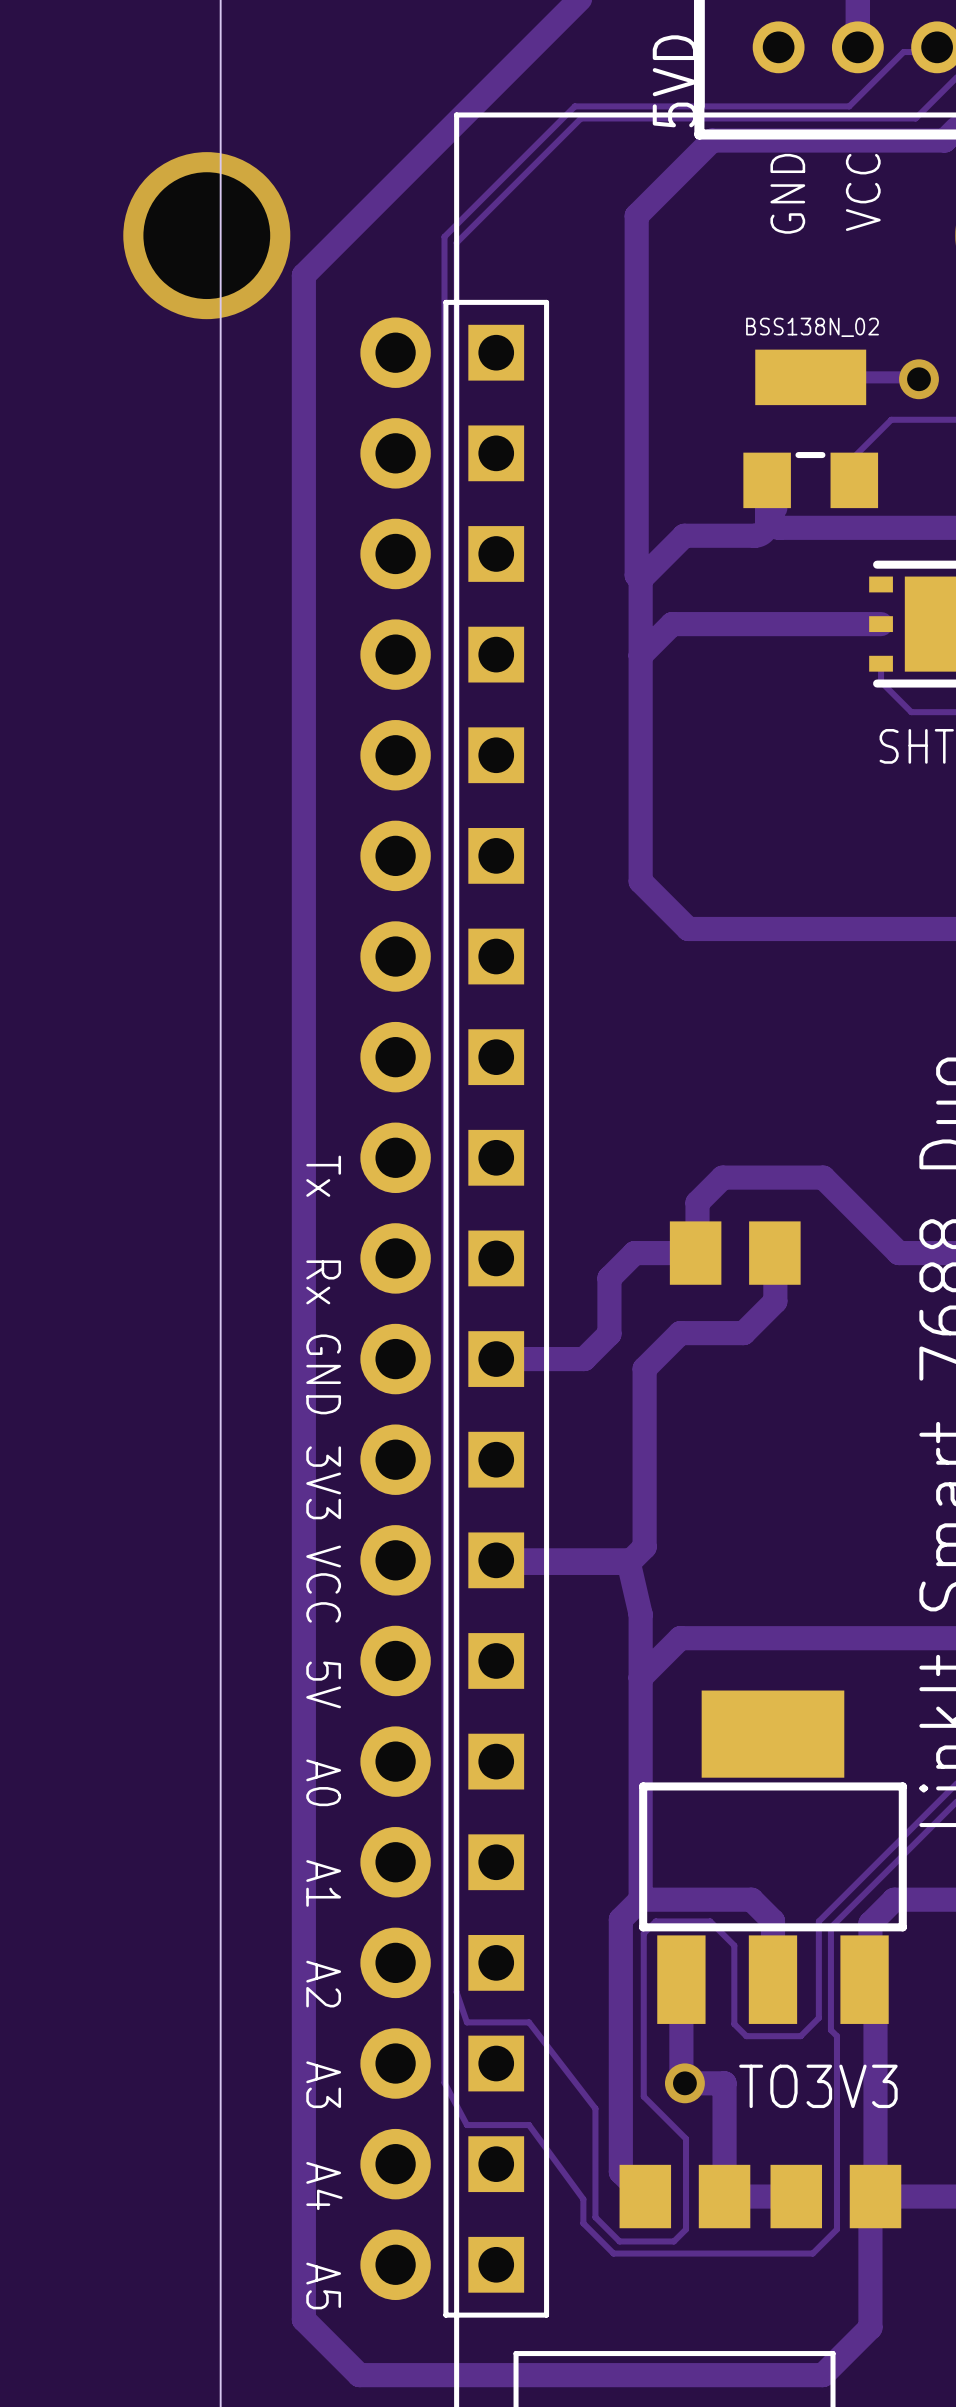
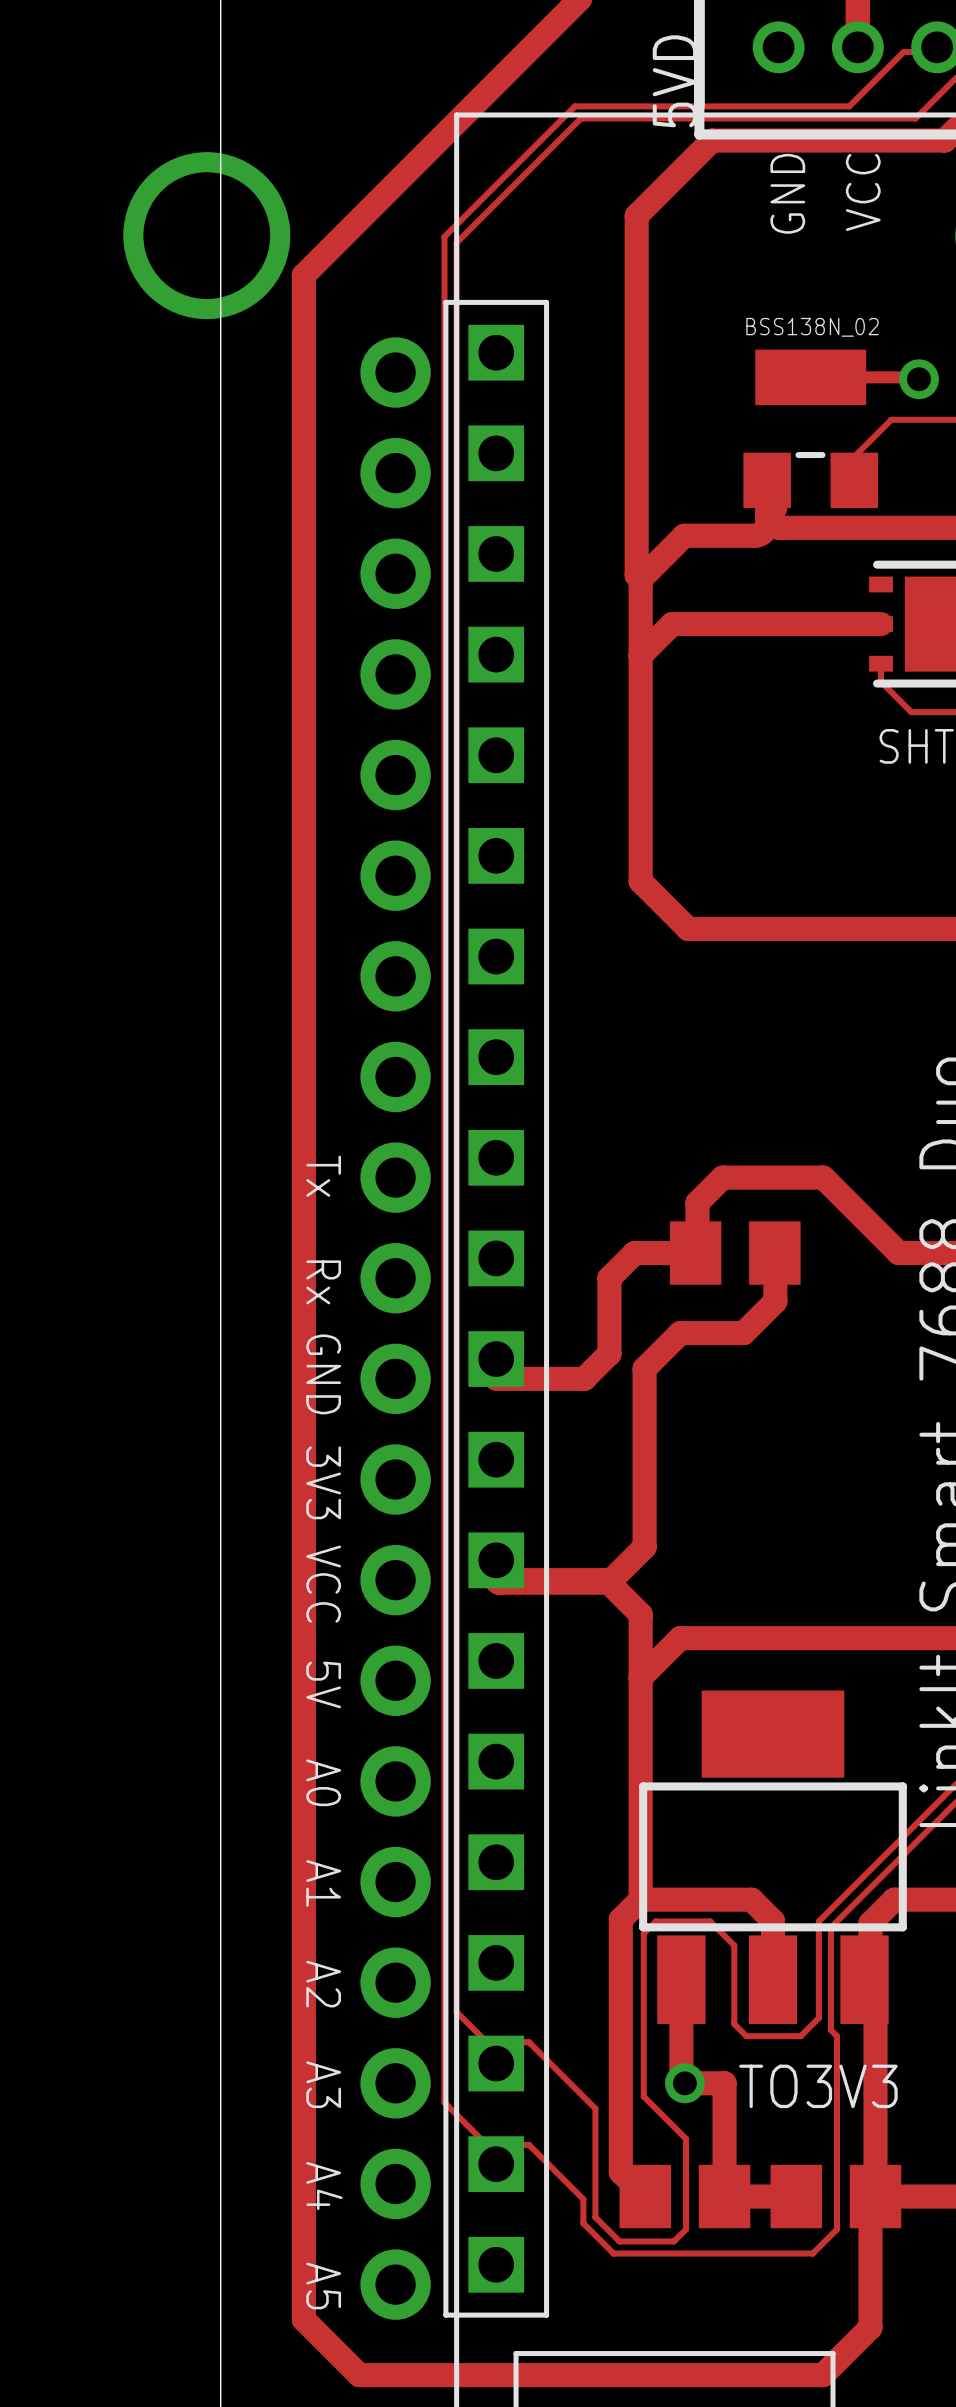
part position: (395, 1308) -> (395, 1328)
track: (609, 1333) (584, 1359) (496, 1359) -> (609, 1333) (609, 1353) (584, 1378) (496, 1378)
track: (631, 1560) (496, 1560) (518, 1562) (628, 1562) (640, 1614) -> (631, 1560) (611, 1580) (496, 1580) (498, 1582) (608, 1582) (640, 1614)
track: (456, 1992) (466, 2022) (529, 2022) (595, 2108) -> (456, 1992) (456, 2012) (486, 2042) (529, 2042) (595, 2108)
track: (444, 2082) (466, 2125) (529, 2125) (583, 2199) -> (444, 2082) (444, 2102) (486, 2144) (529, 2144) (583, 2199)

